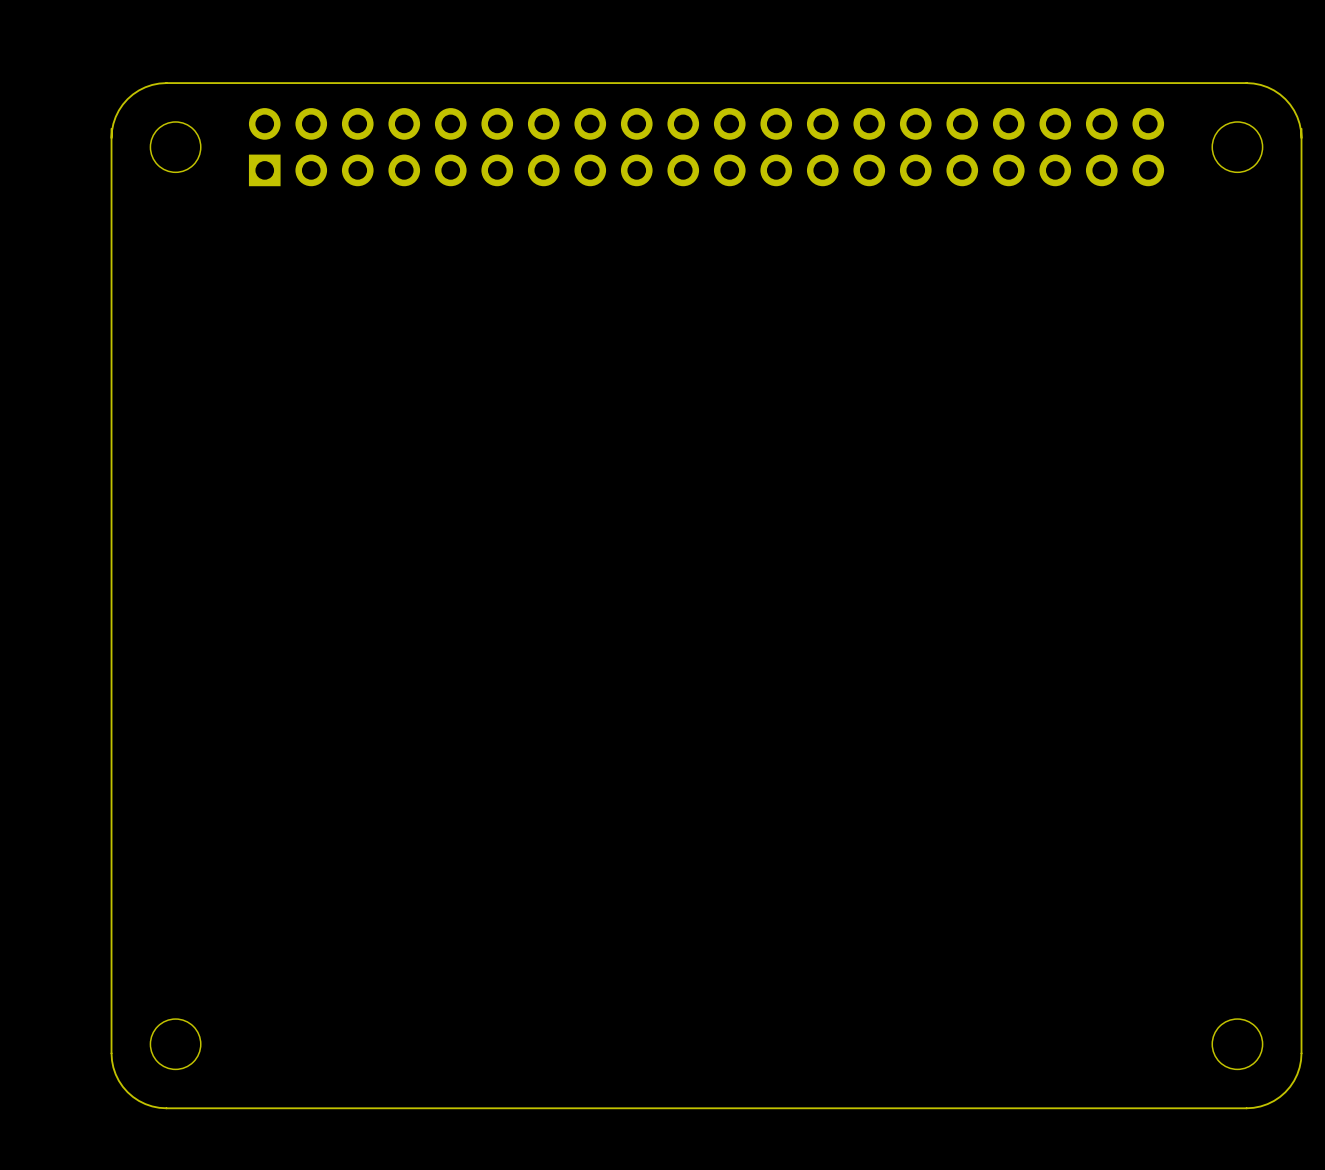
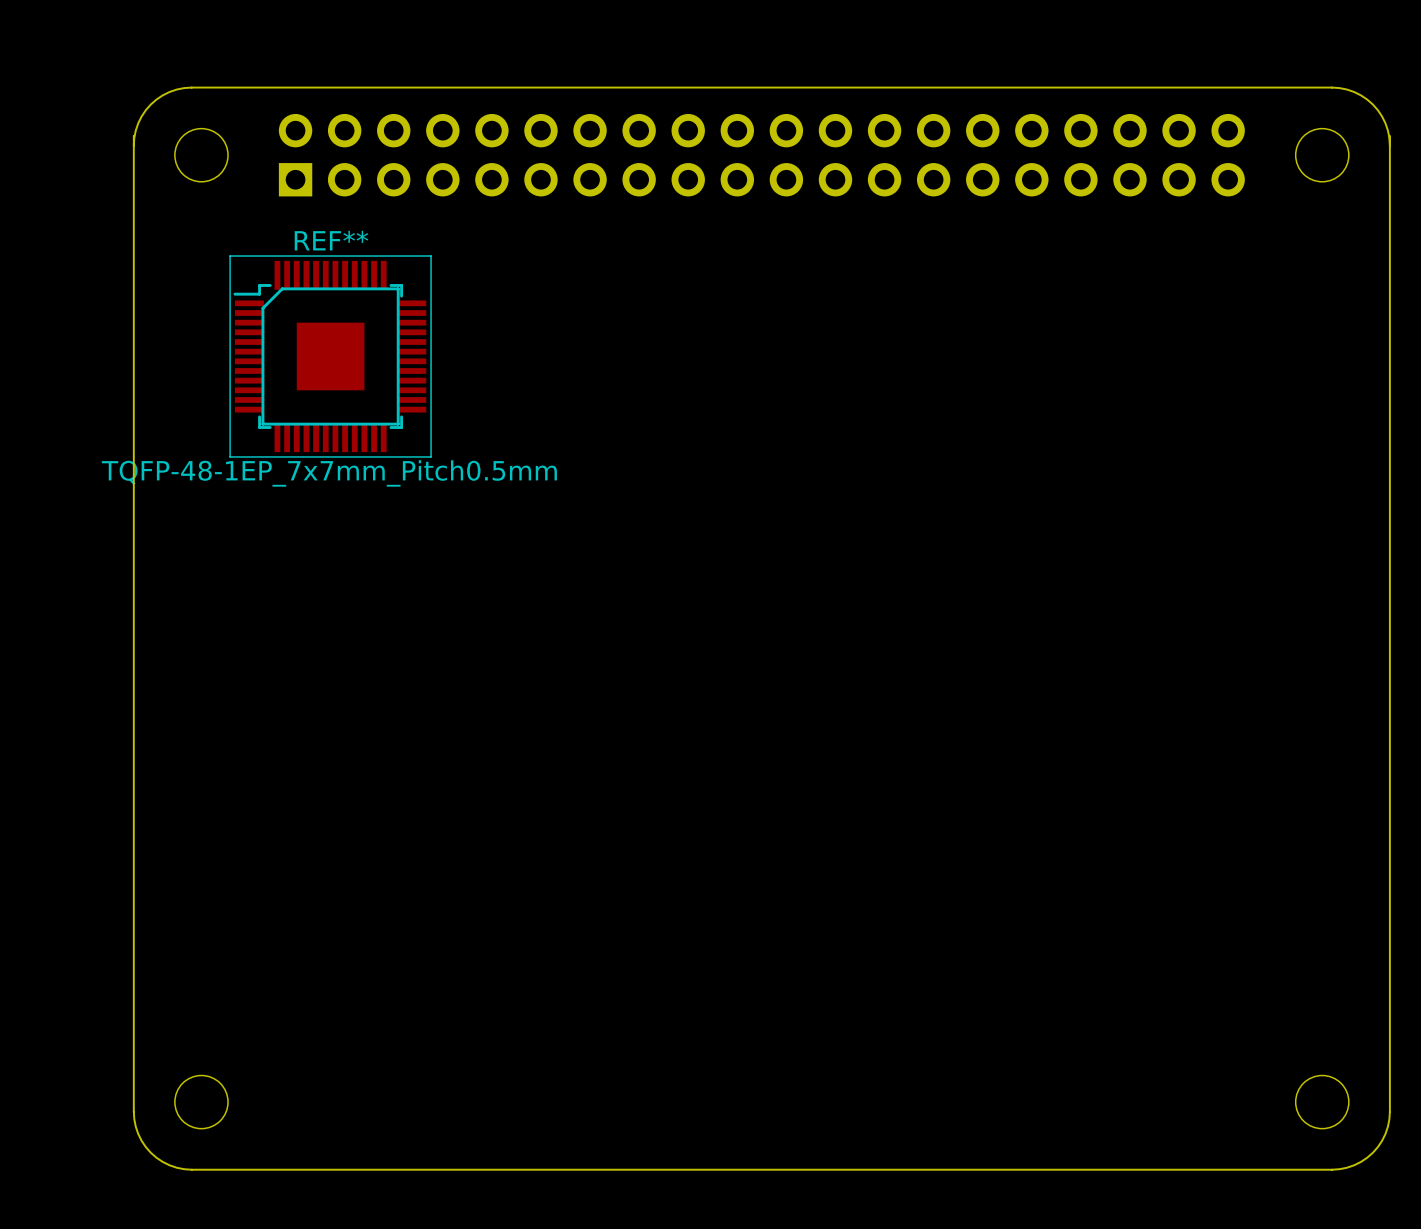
REF**: none -> TQFP-48-1EP_7x7mm_Pitch0.5mm (330, 356)

